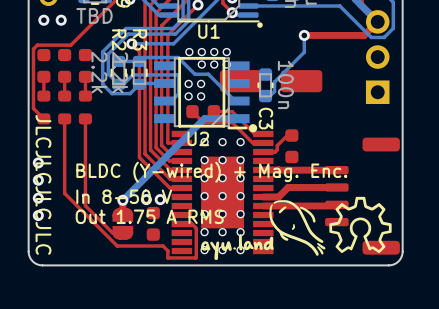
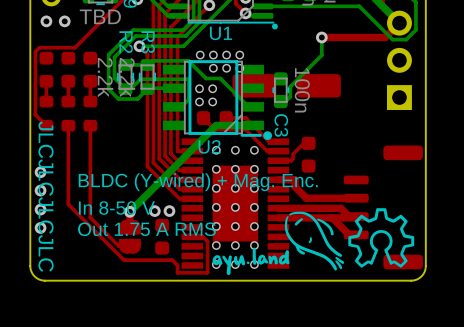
top track: (336, 170) (278, 170) -> none
top track: (289, 187) (278, 196) -> (306, 198) (295, 186) (295, 180)
top track: none -> (294, 208) (340, 208) (349, 216)
top track: none -> (332, 217) (349, 234)

